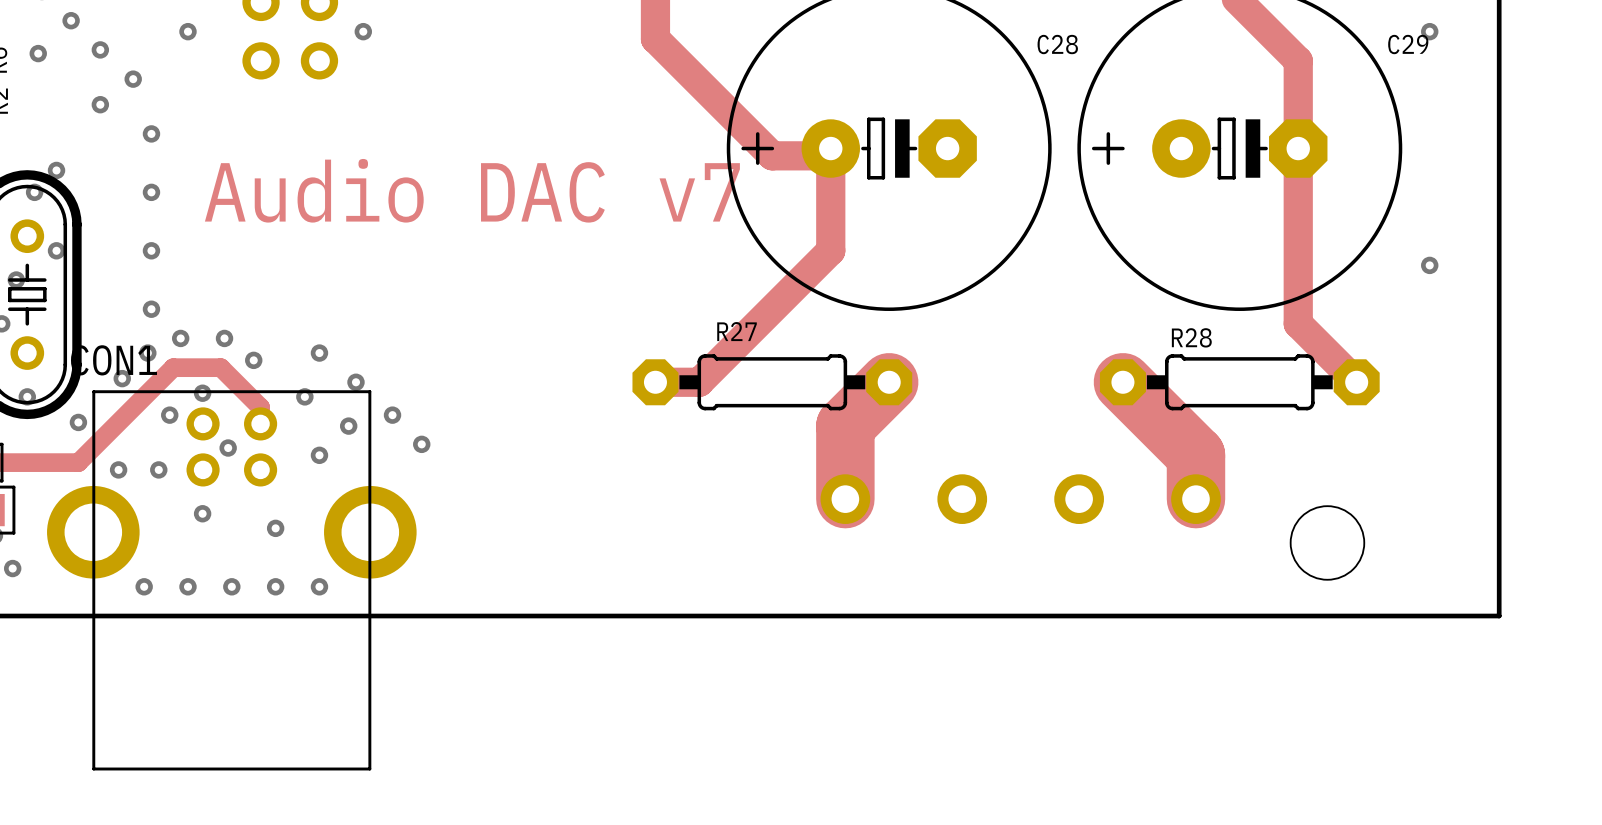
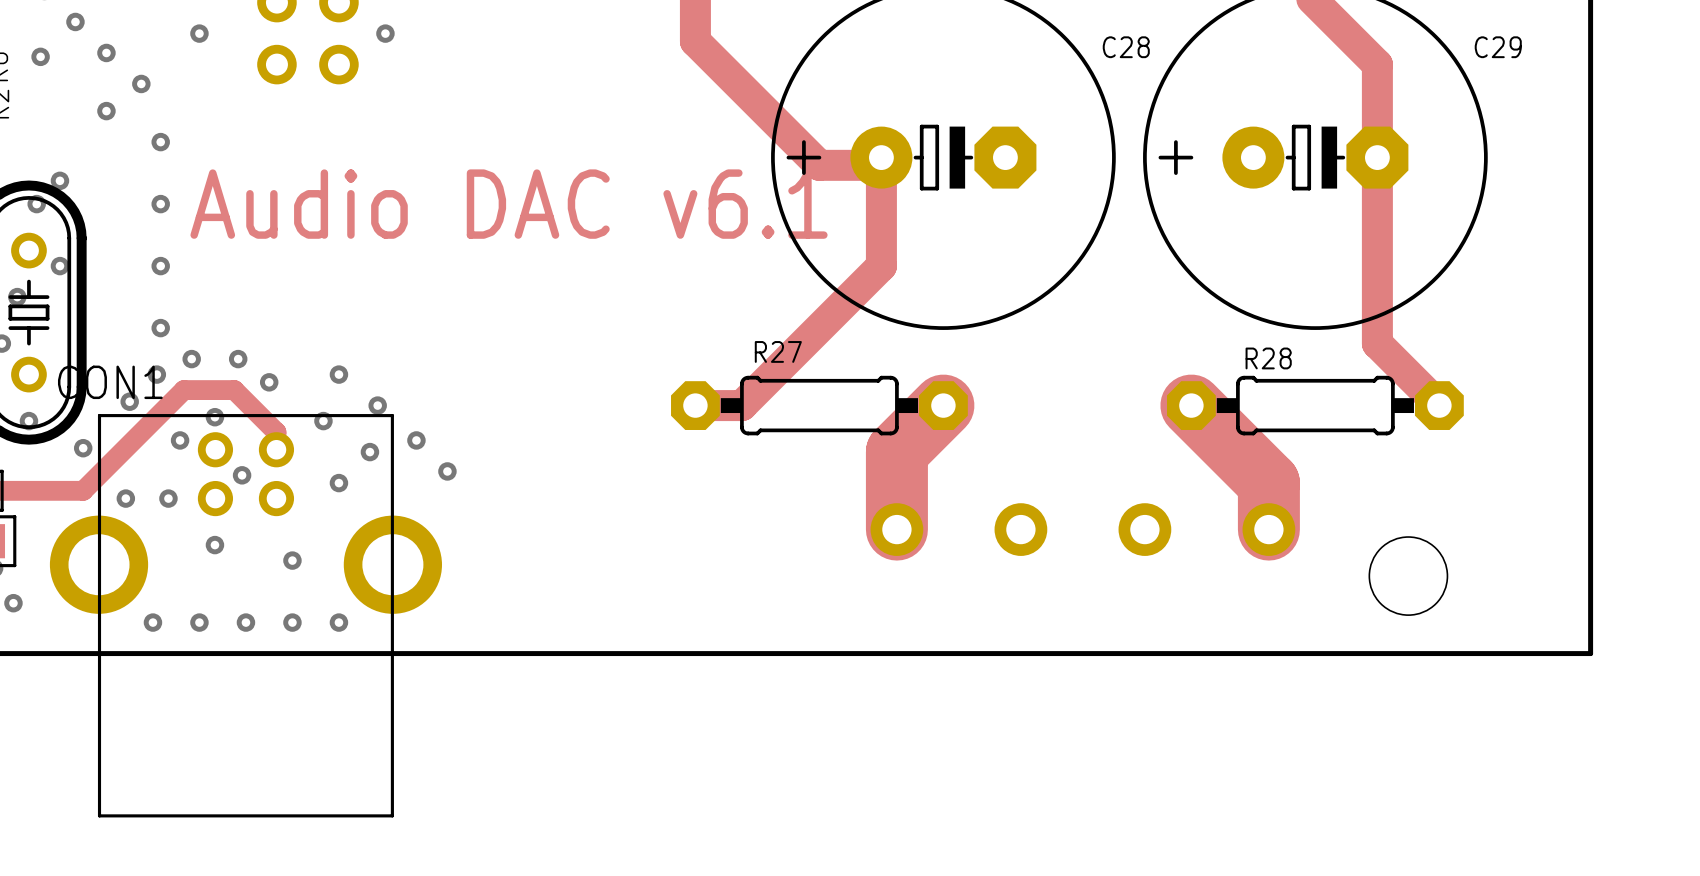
via: (1429, 31) -> none
text: Audio DAC v7 (472, 190) -> Audio DAC v6.1 (509, 204)
via: (1429, 265) -> none

